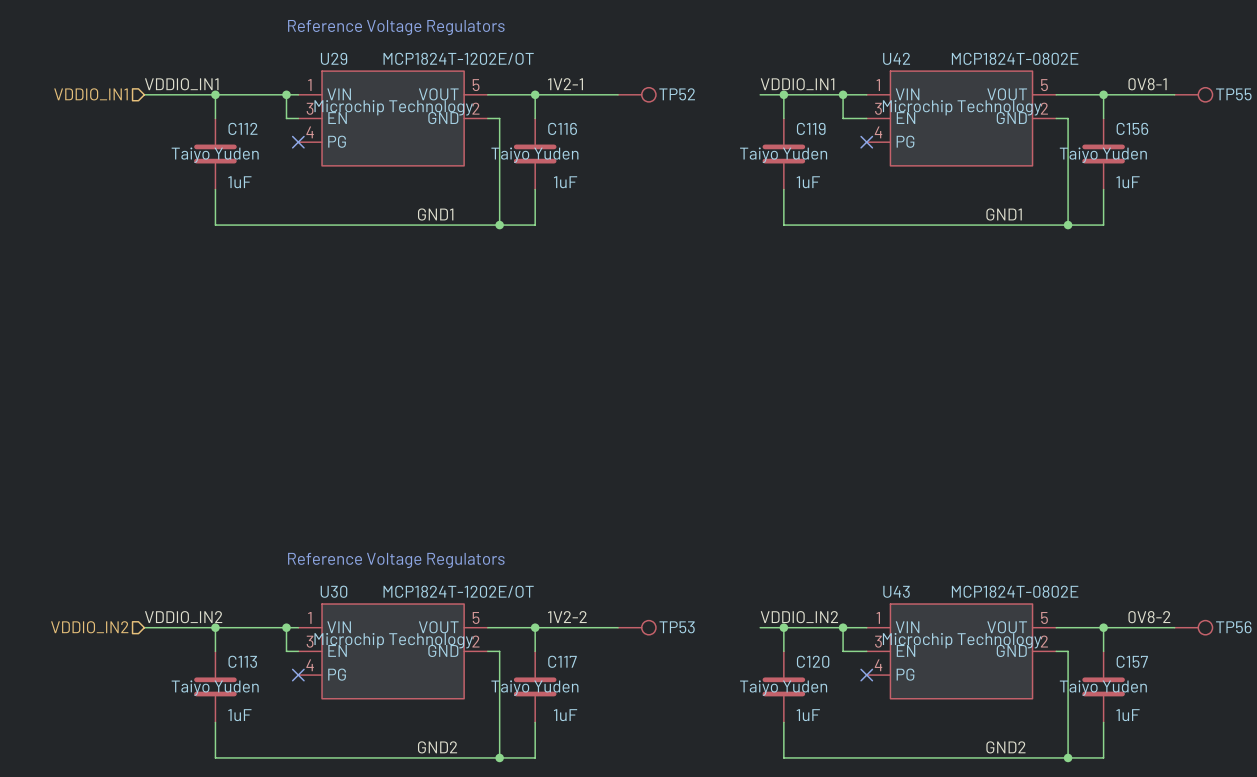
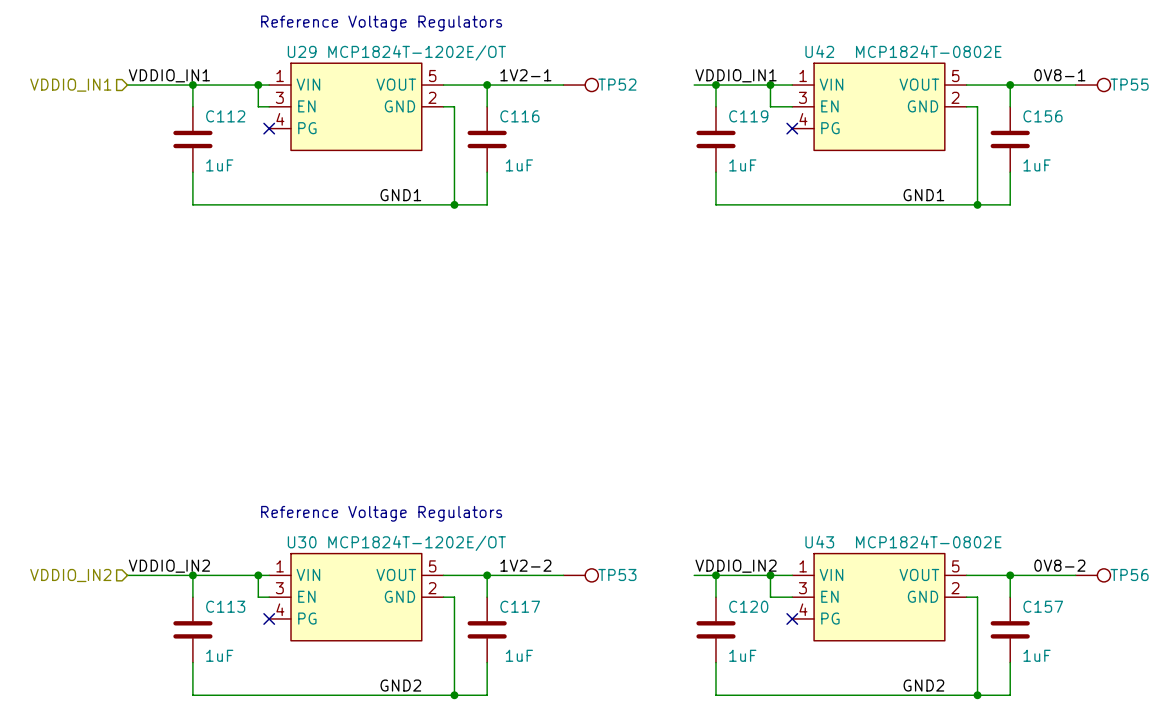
U29 text: Microchip Technology (393, 107) -> none
U42 text: Microchip Technology (962, 107) -> none
C112 text: Taiyo Yuden (215, 155) -> none
C116 text: Taiyo Yuden (534, 155) -> none
C119 text: Taiyo Yuden (783, 155) -> none
C156 text: Taiyo Yuden (1103, 155) -> none
U30 text: Microchip Technology (393, 640) -> none
U43 text: Microchip Technology (962, 640) -> none
C113 text: Taiyo Yuden (215, 688) -> none
C117 text: Taiyo Yuden (534, 688) -> none
C120 text: Taiyo Yuden (783, 688) -> none
C157 text: Taiyo Yuden (1103, 688) -> none

